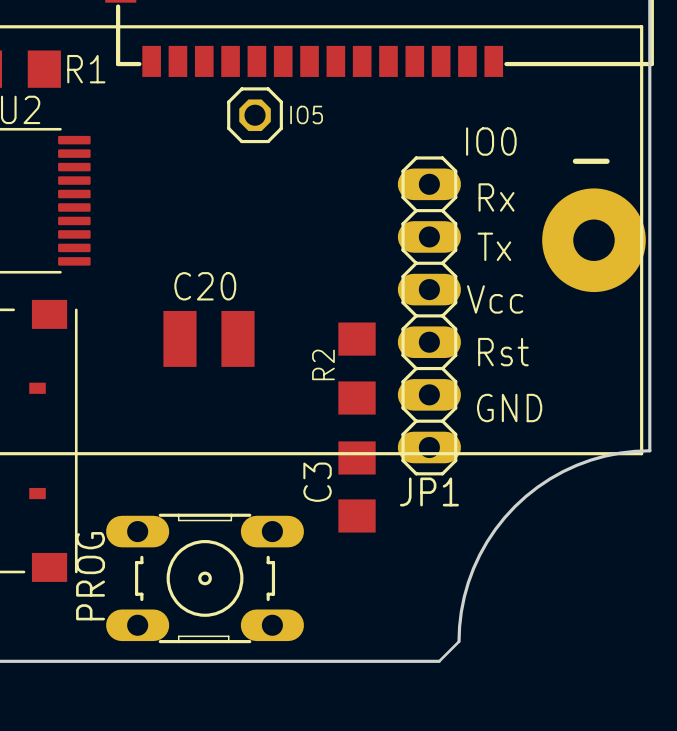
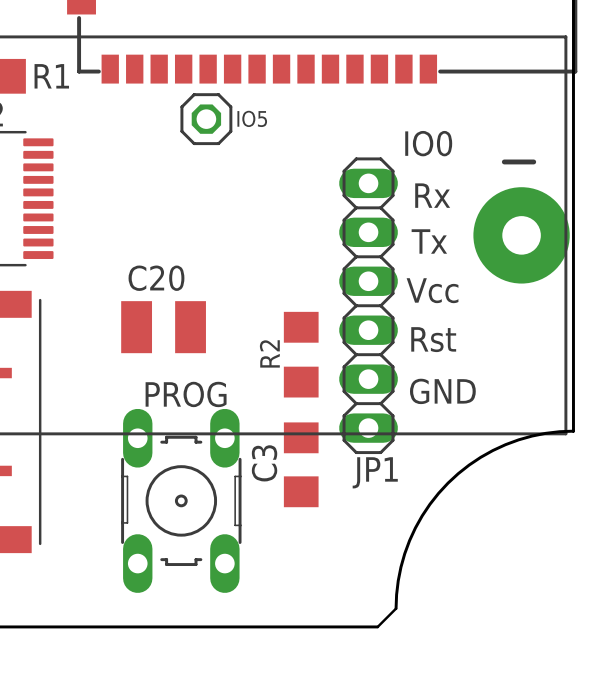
PROG rotation: 0° (205, 578) -> 90° clockwise (181, 500)

